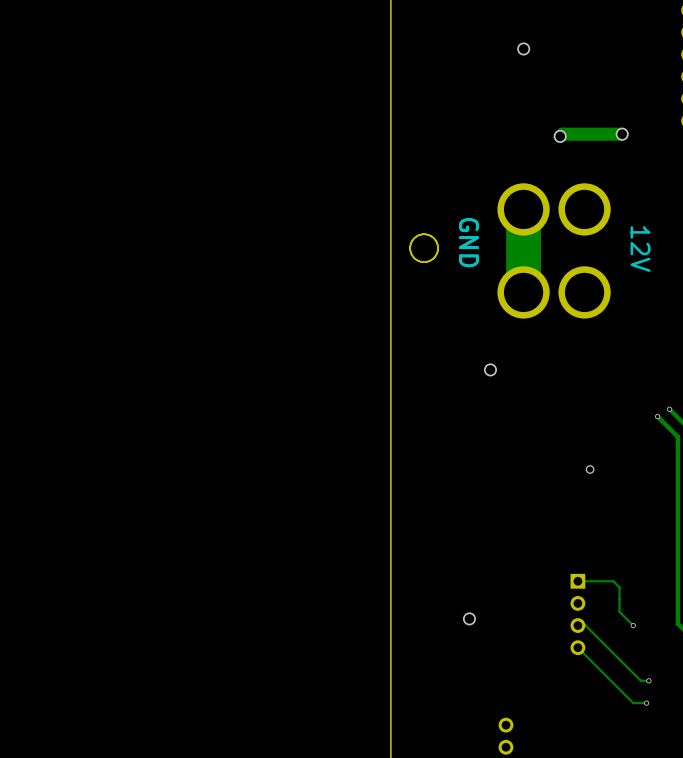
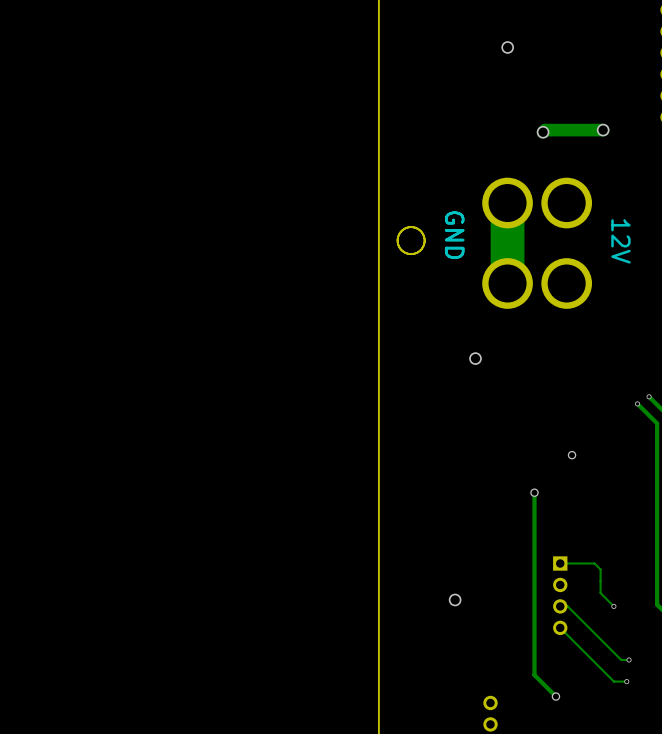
track: none -> (534, 492) (534, 675) (555, 696)
via: none -> (534, 492)
via: none -> (555, 696)

